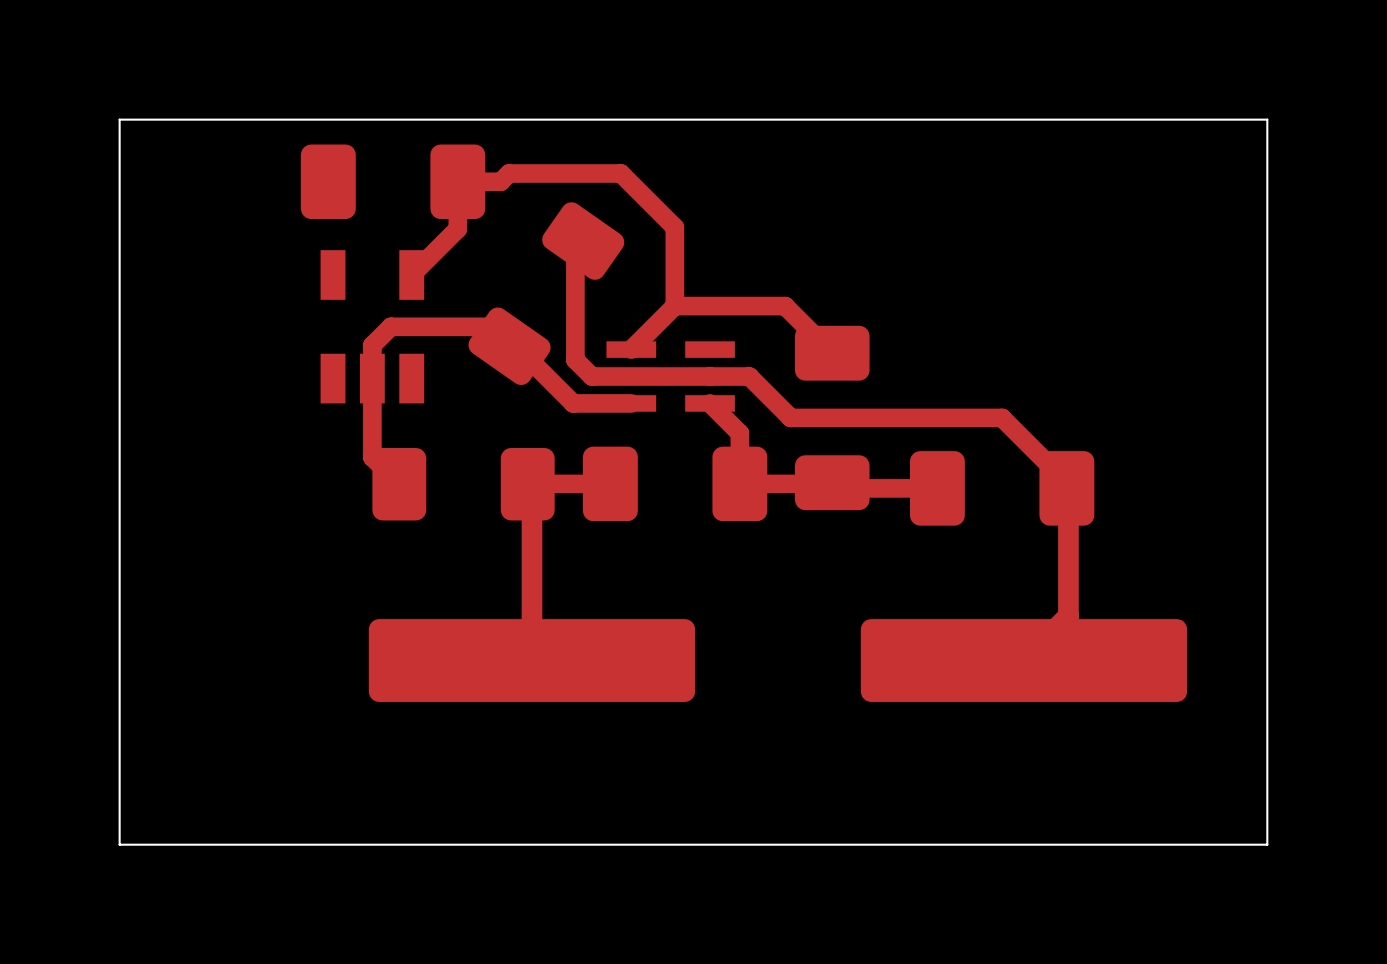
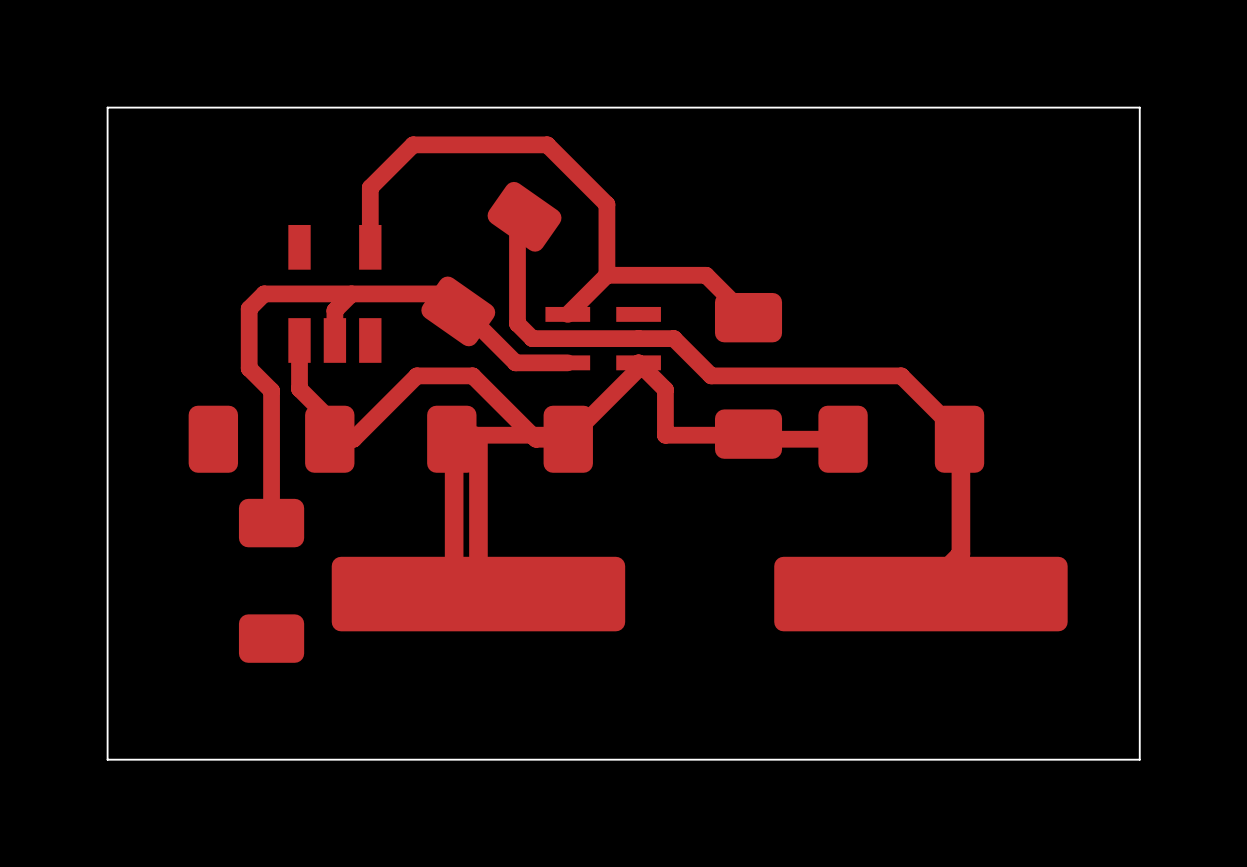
top track: (620, 173) (509, 173) (500, 181) (457, 181) (457, 228) (411, 275) -> (558, 156) (547, 144) (413, 144) (370, 187) (370, 247)
part: (393, 181) -> none
top track: none -> (351, 293) (264, 293) (249, 308) (249, 368) (271, 390) (271, 523)
top track: none -> (299, 340) (299, 388) (329, 419) (329, 439) (353, 439) (416, 375) (472, 375) (536, 439) (568, 439) (638, 368) (638, 362)
top track: (372, 378) (372, 457) (399, 484) -> none
part position: (675, 483) -> (510, 439)
part rotation: 0° (463, 484) -> 90° clockwise (271, 580)
part position: (463, 484) -> (271, 580)
top track: none -> (454, 437) (454, 569)
part: none -> (271, 439)

